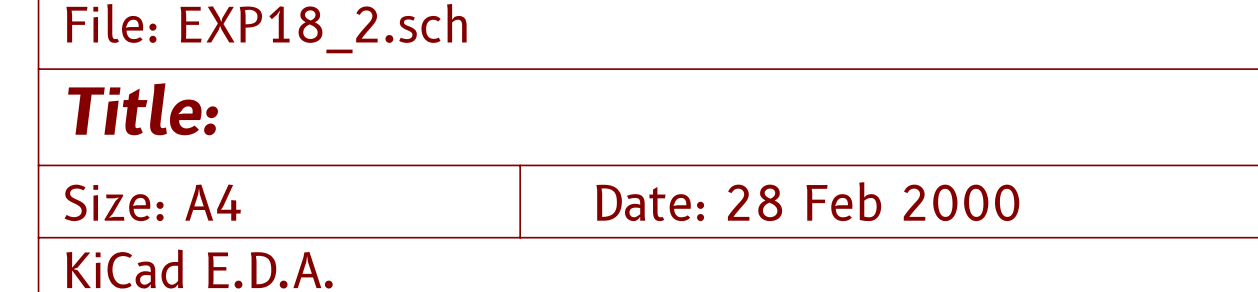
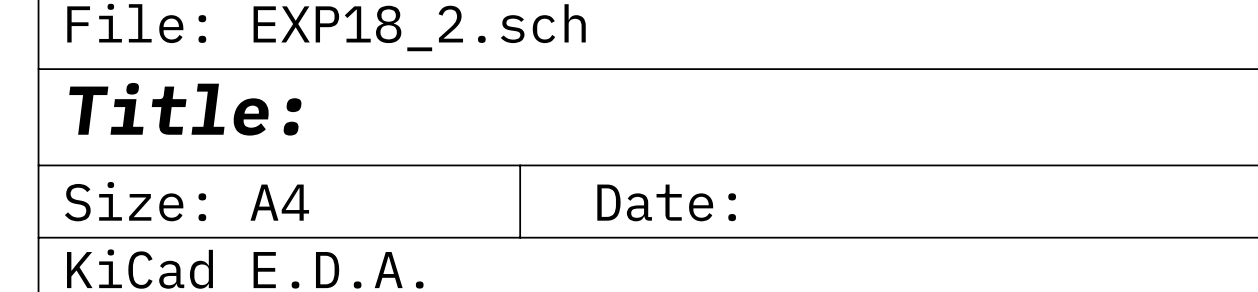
title block: Date: 28 Feb 2000 (807, 201) -> Date: (666, 202)

